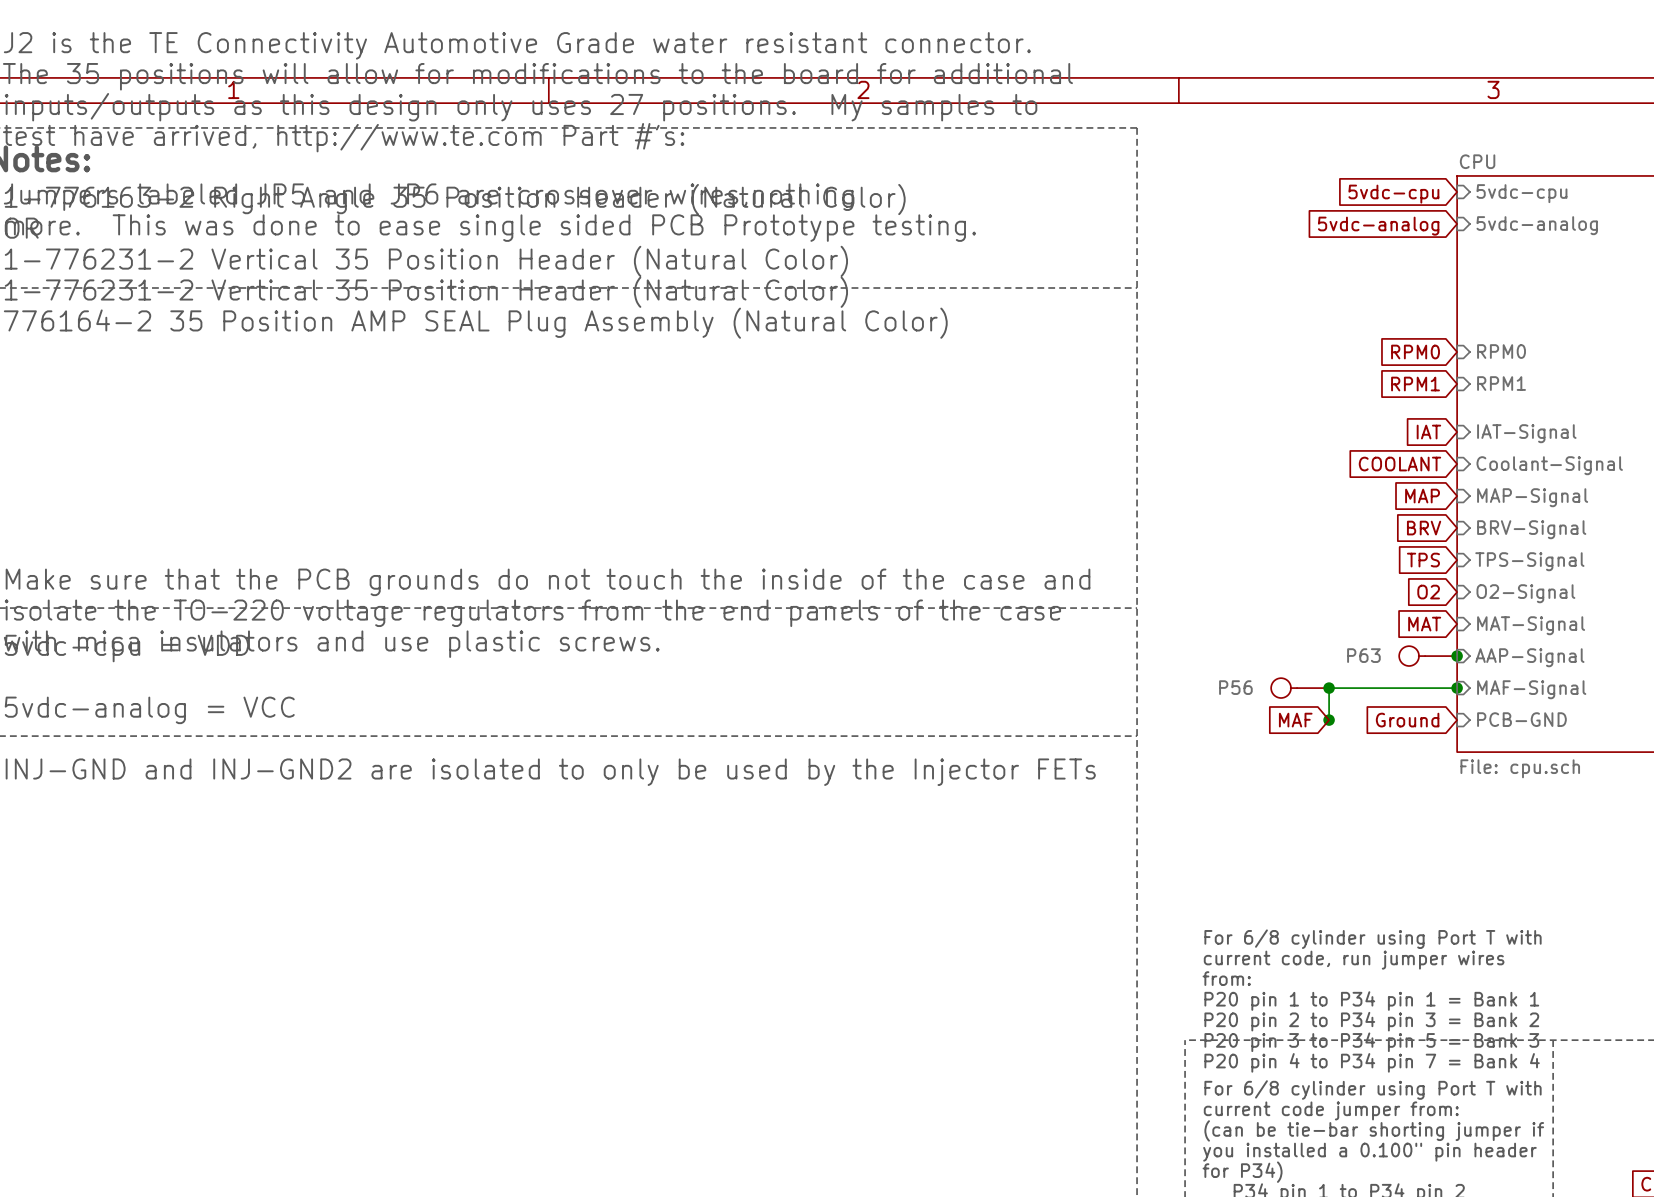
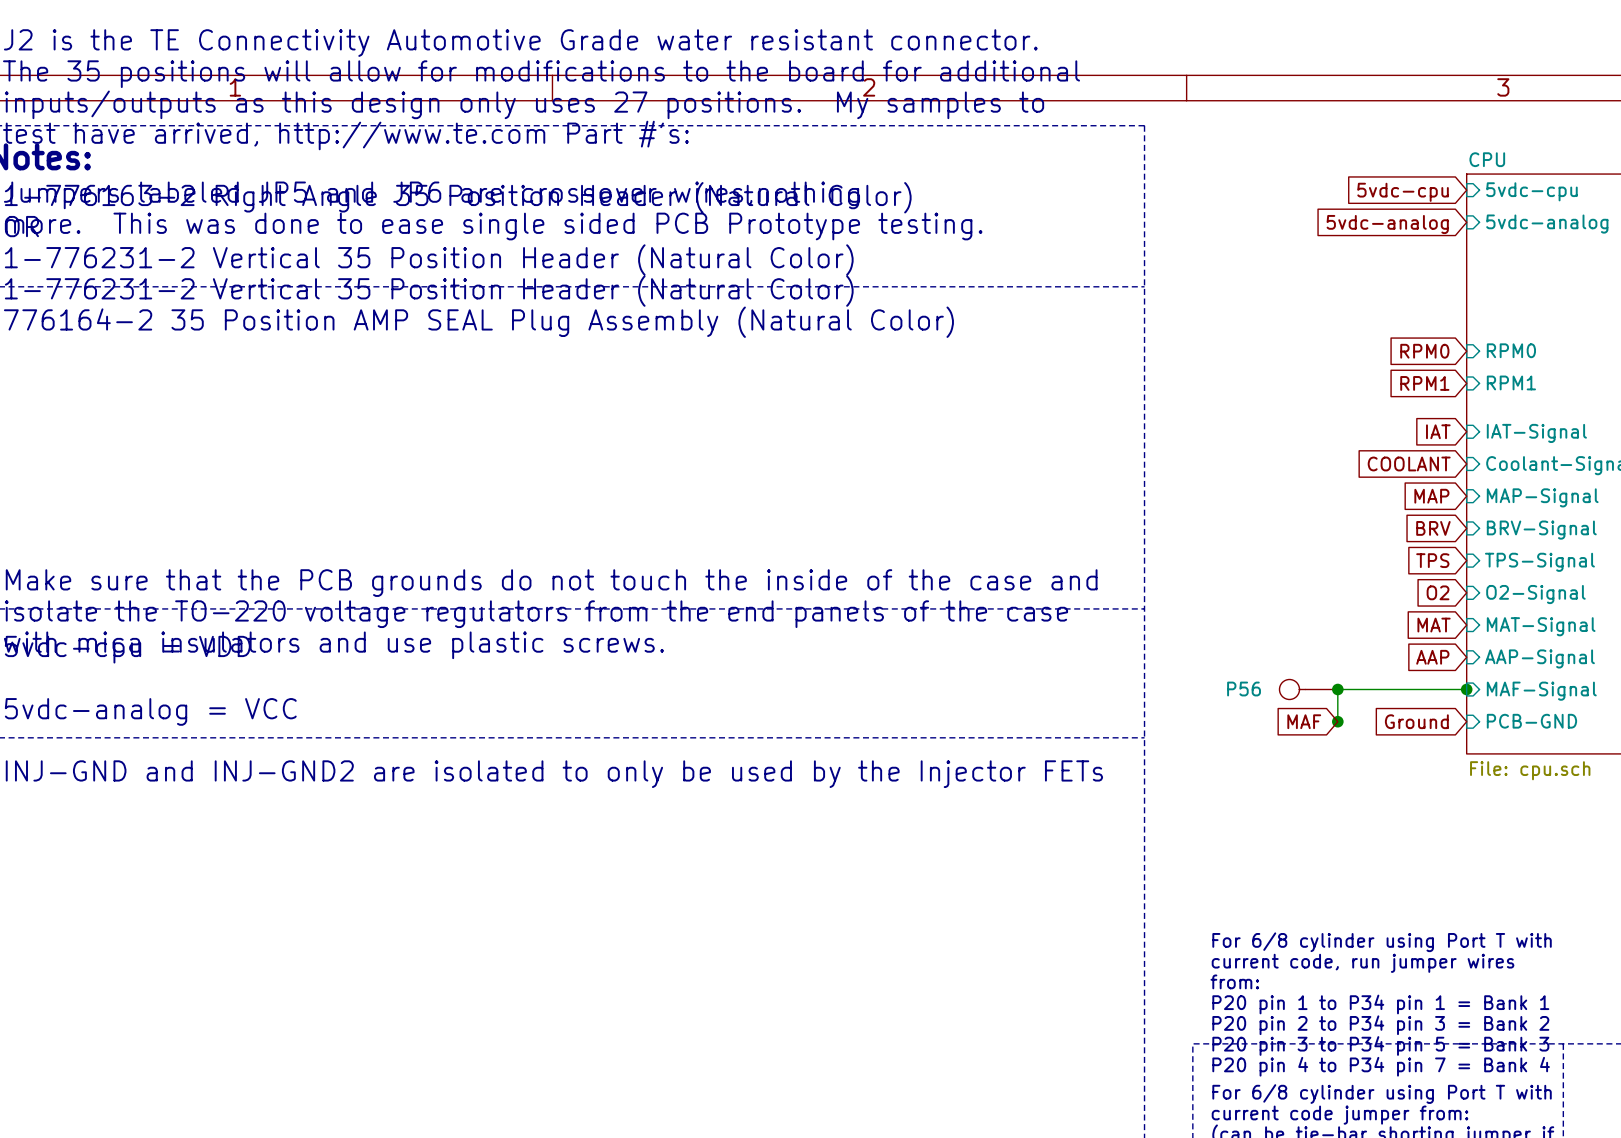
global label: none -> AAP (1432, 657)
P63: (1428, 656) -> none
junction: (1457, 656) -> none

